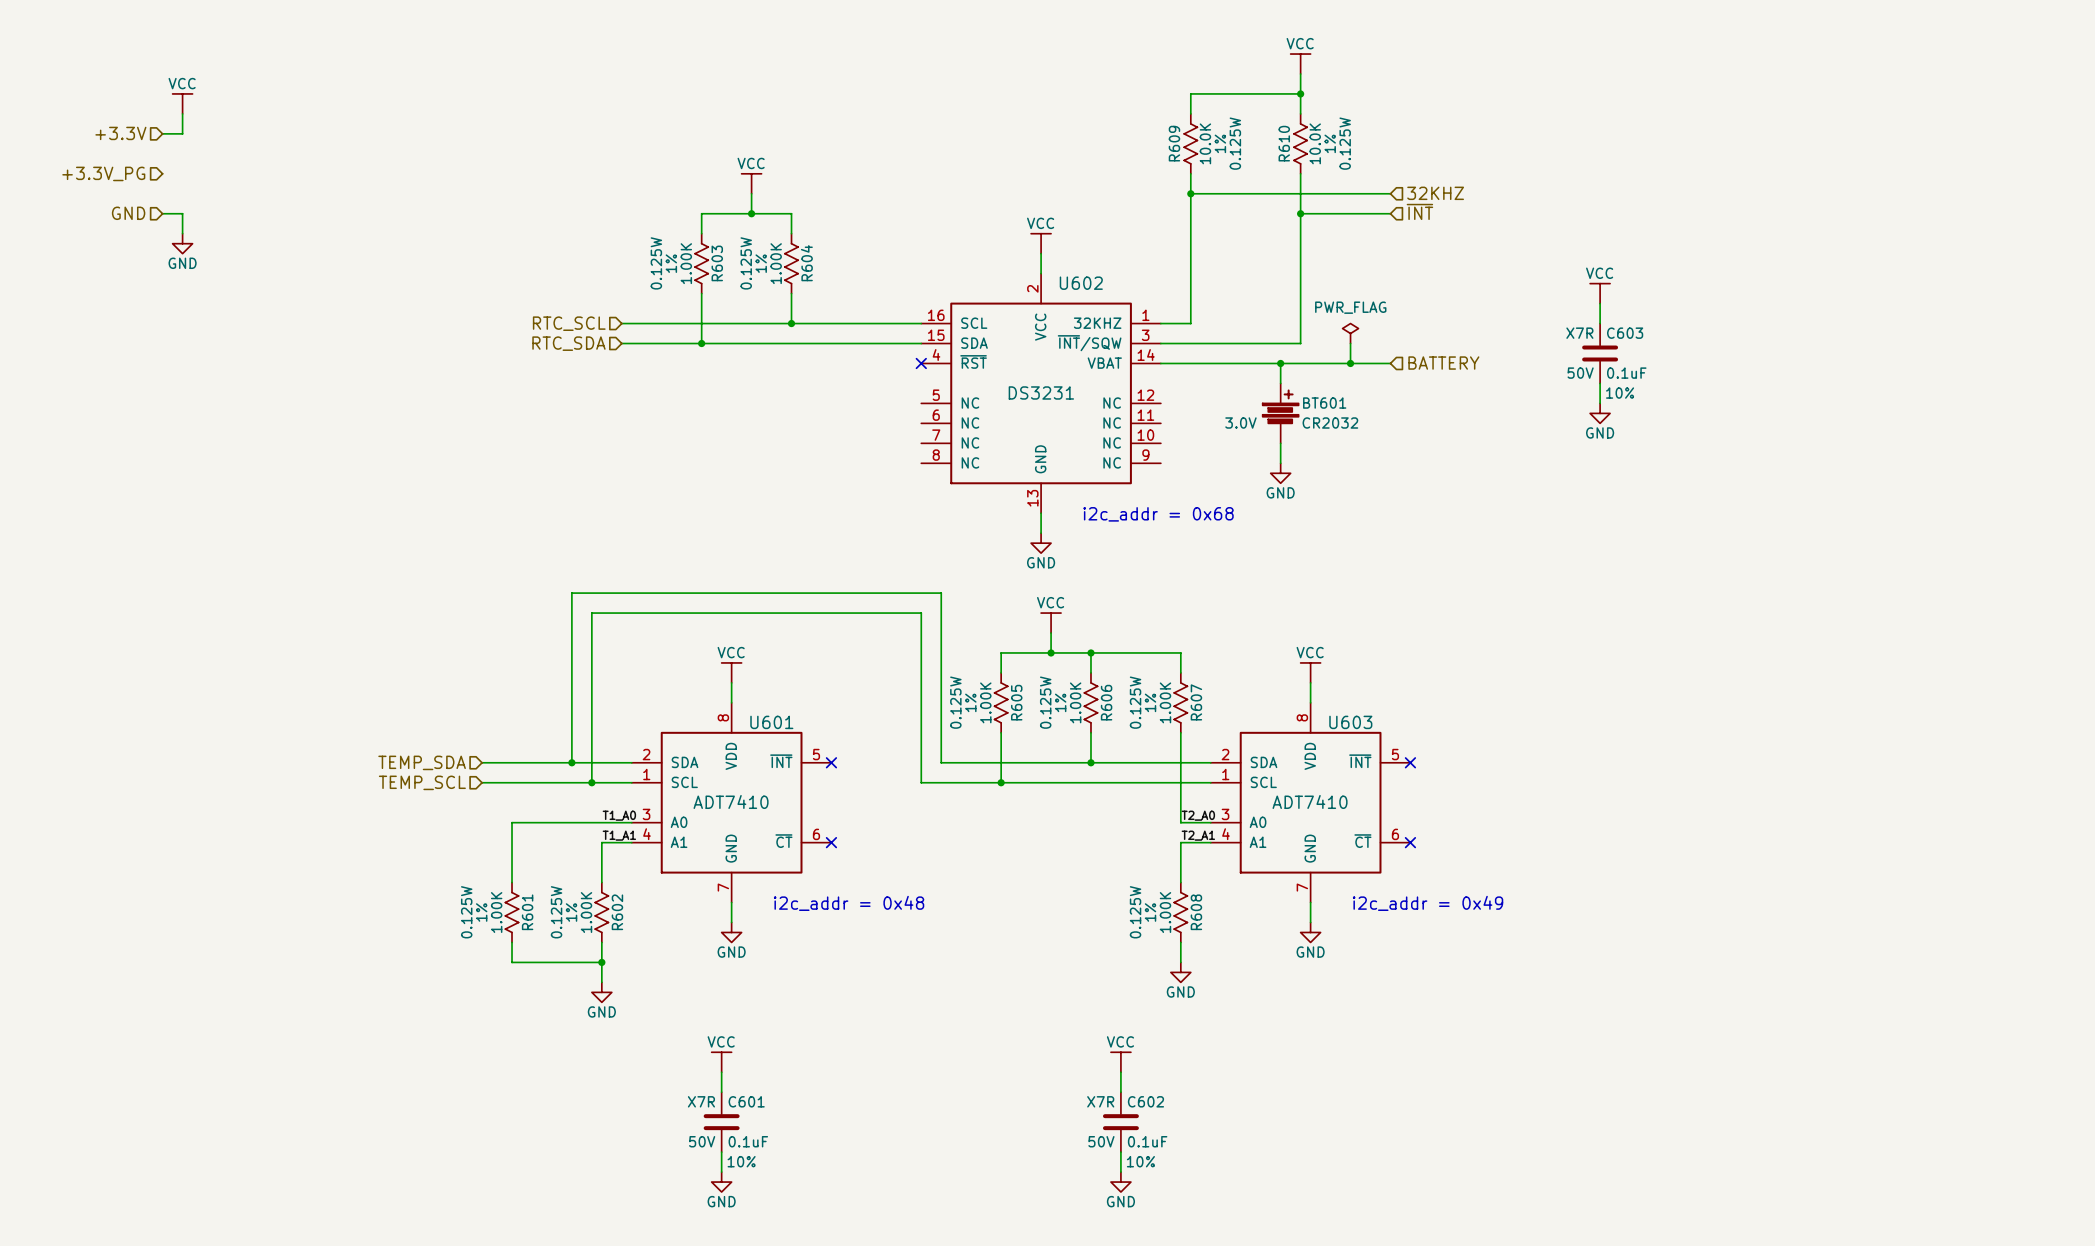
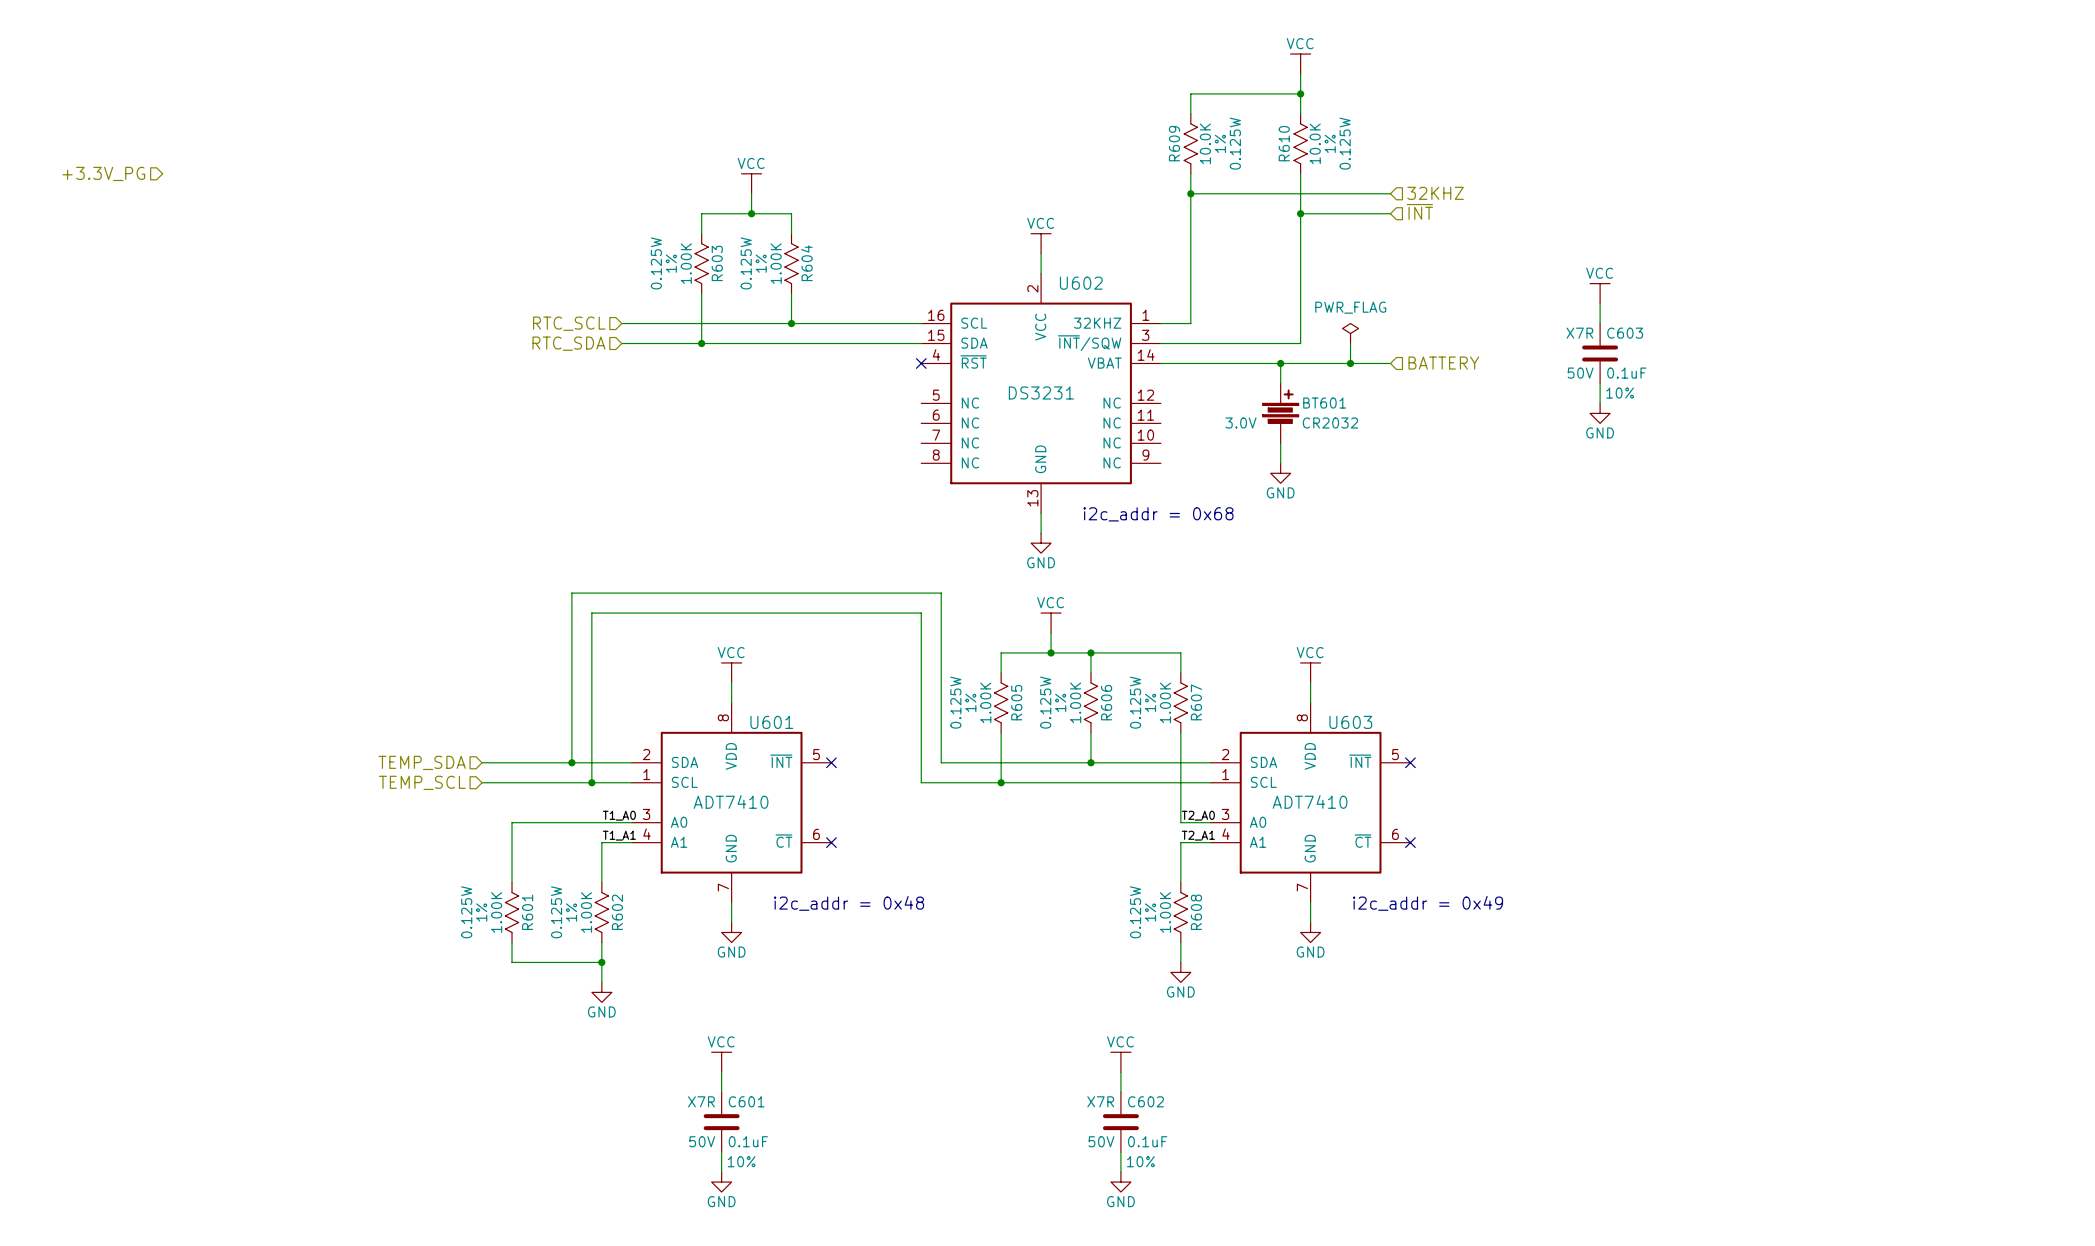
power symbol: VCC (182, 103) -> none
wire: (182, 113) (182, 133) (162, 133) -> none
hierarchical label: +3.3V (120, 133) -> none
hierarchical label: GND (128, 213) -> none
wire: (162, 213) (182, 213) (182, 233) -> none
power symbol: GND (182, 243) -> none

